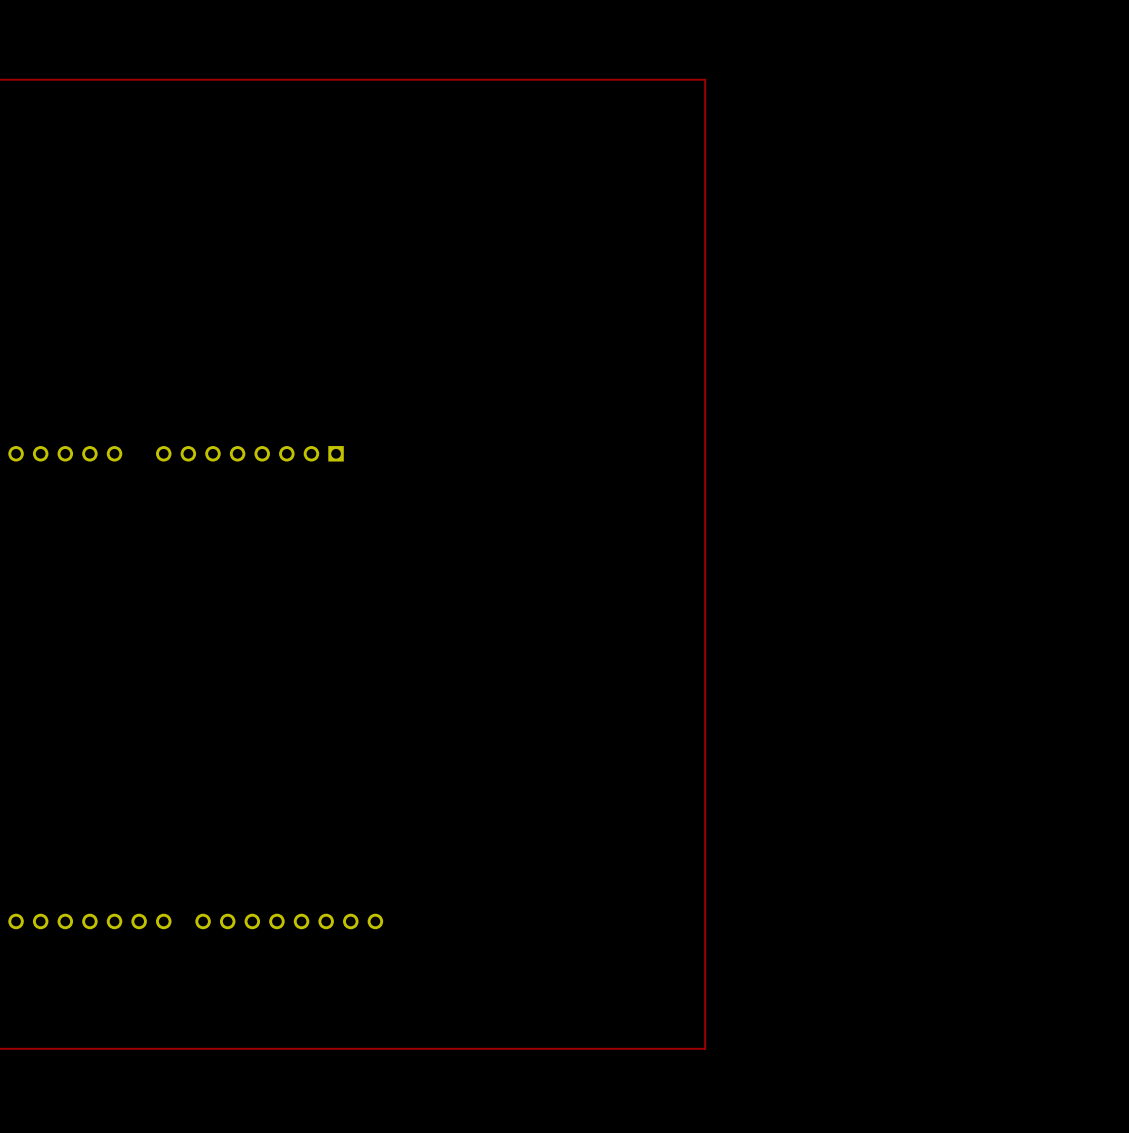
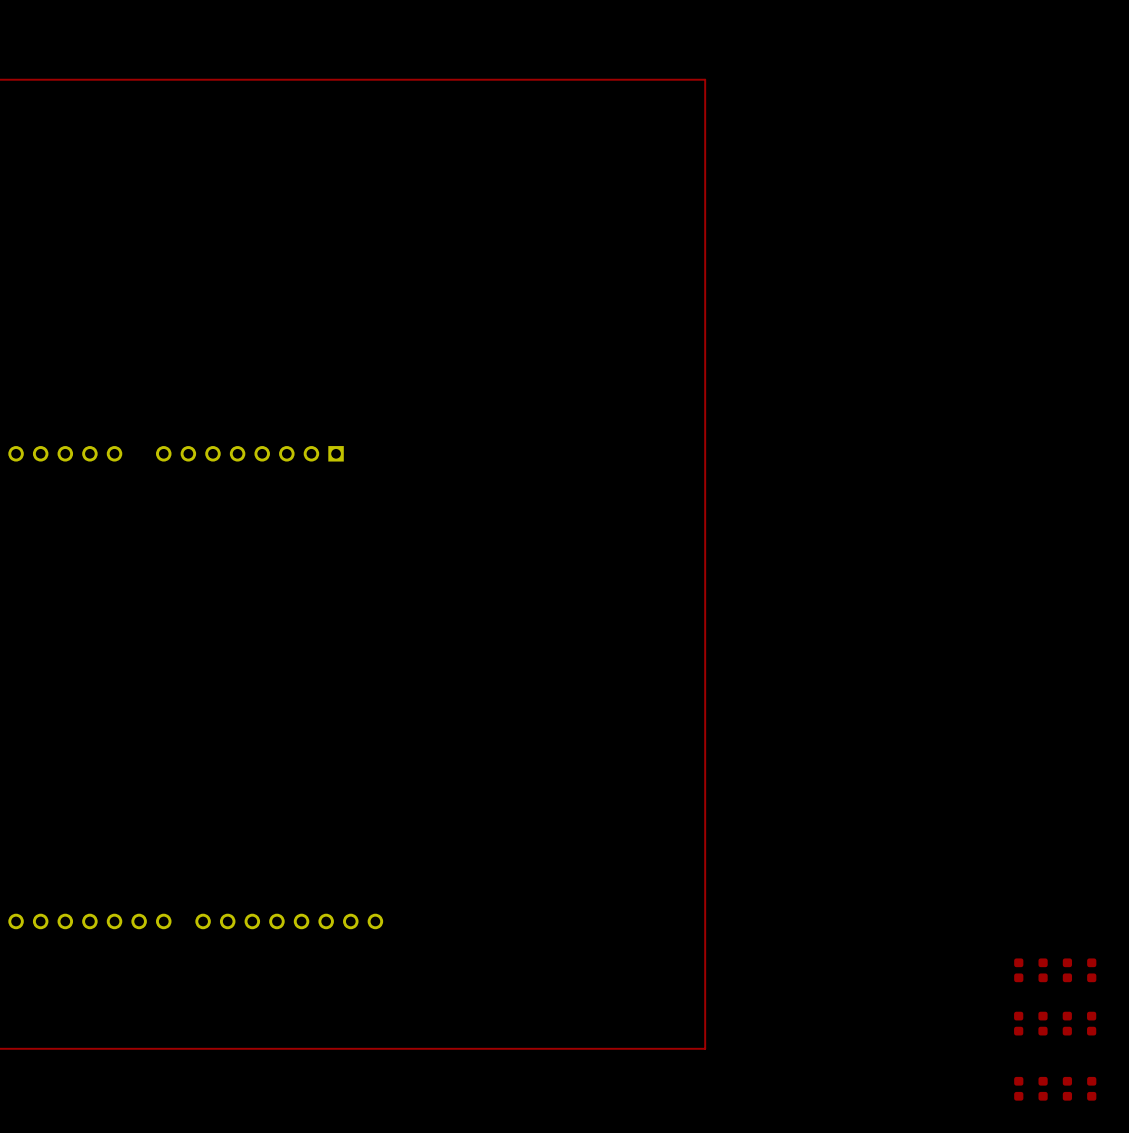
part: none -> (1018, 970)
part: none -> (1043, 970)
part: none -> (1067, 970)
part: none -> (1091, 970)
part: none -> (1018, 1023)
part: none -> (1042, 1023)
part: none -> (1067, 1023)
part: none -> (1091, 1023)
part: none -> (1018, 1088)
part: none -> (1043, 1088)
part: none -> (1067, 1088)
part: none -> (1091, 1088)

